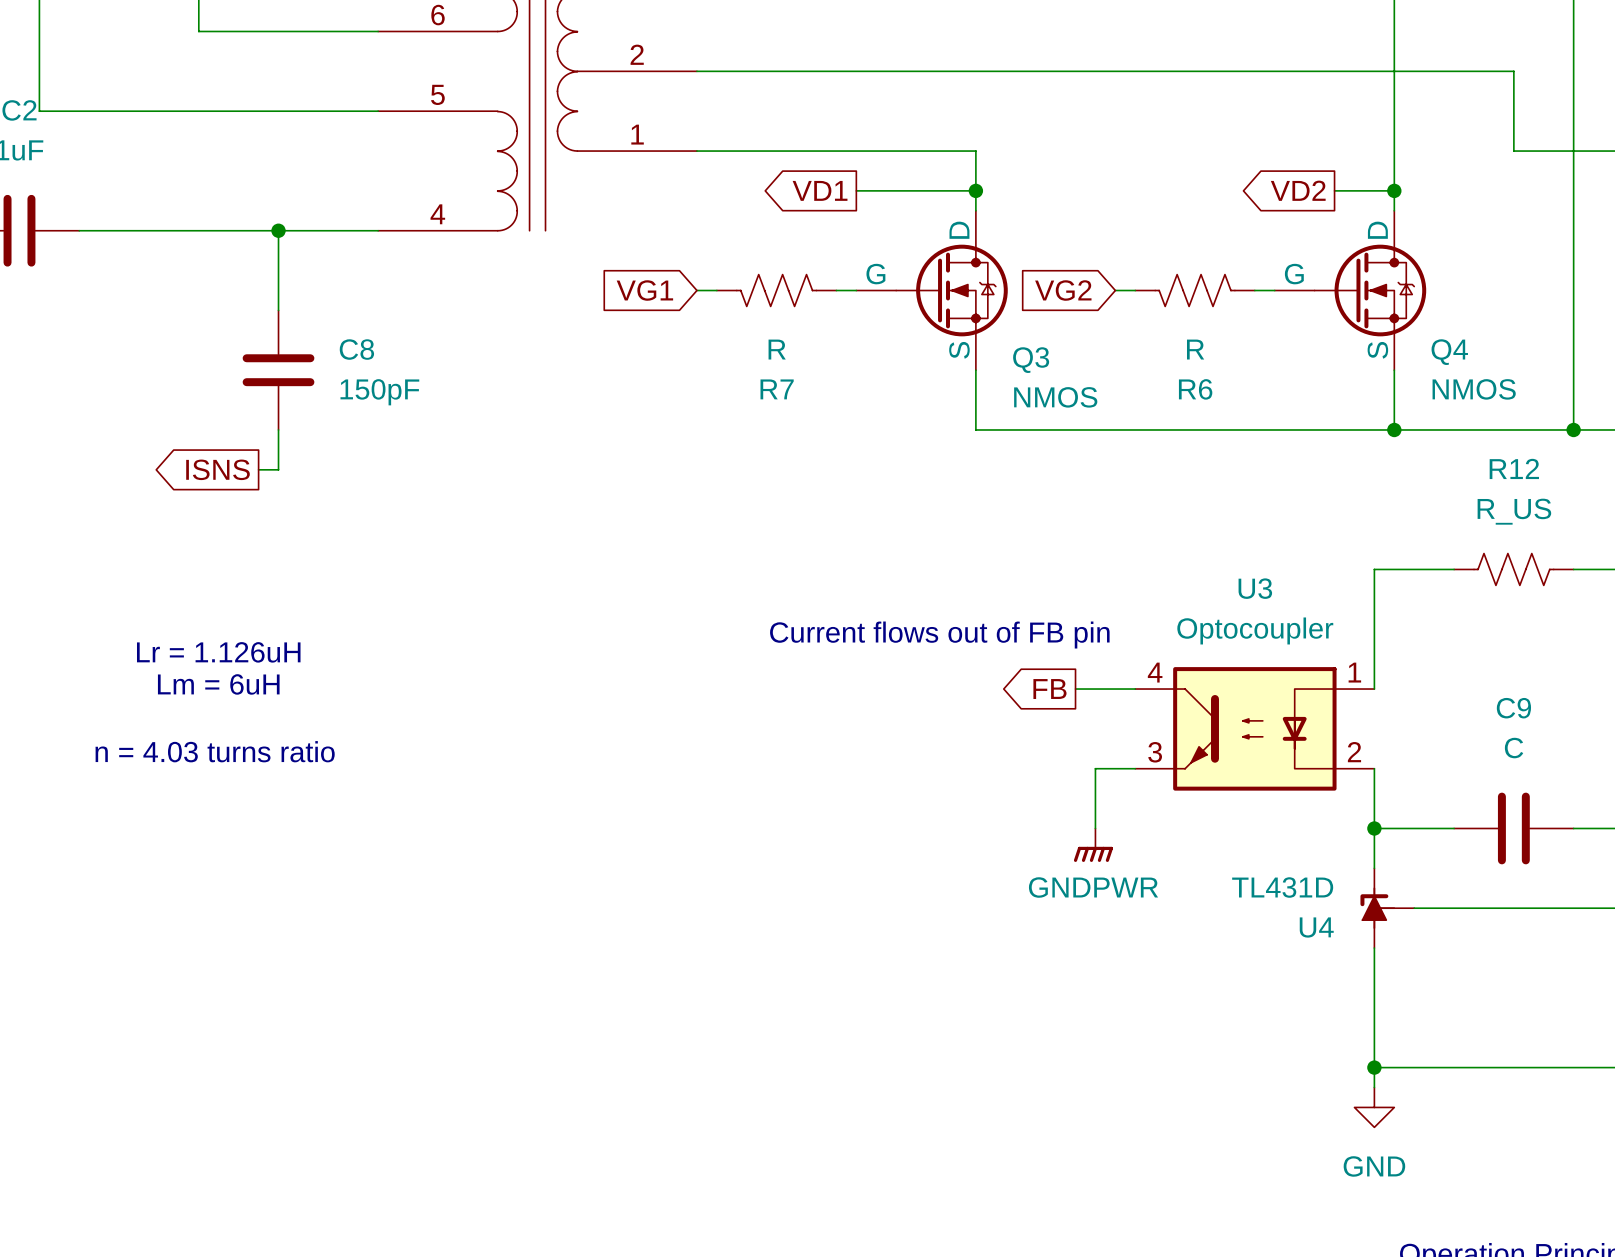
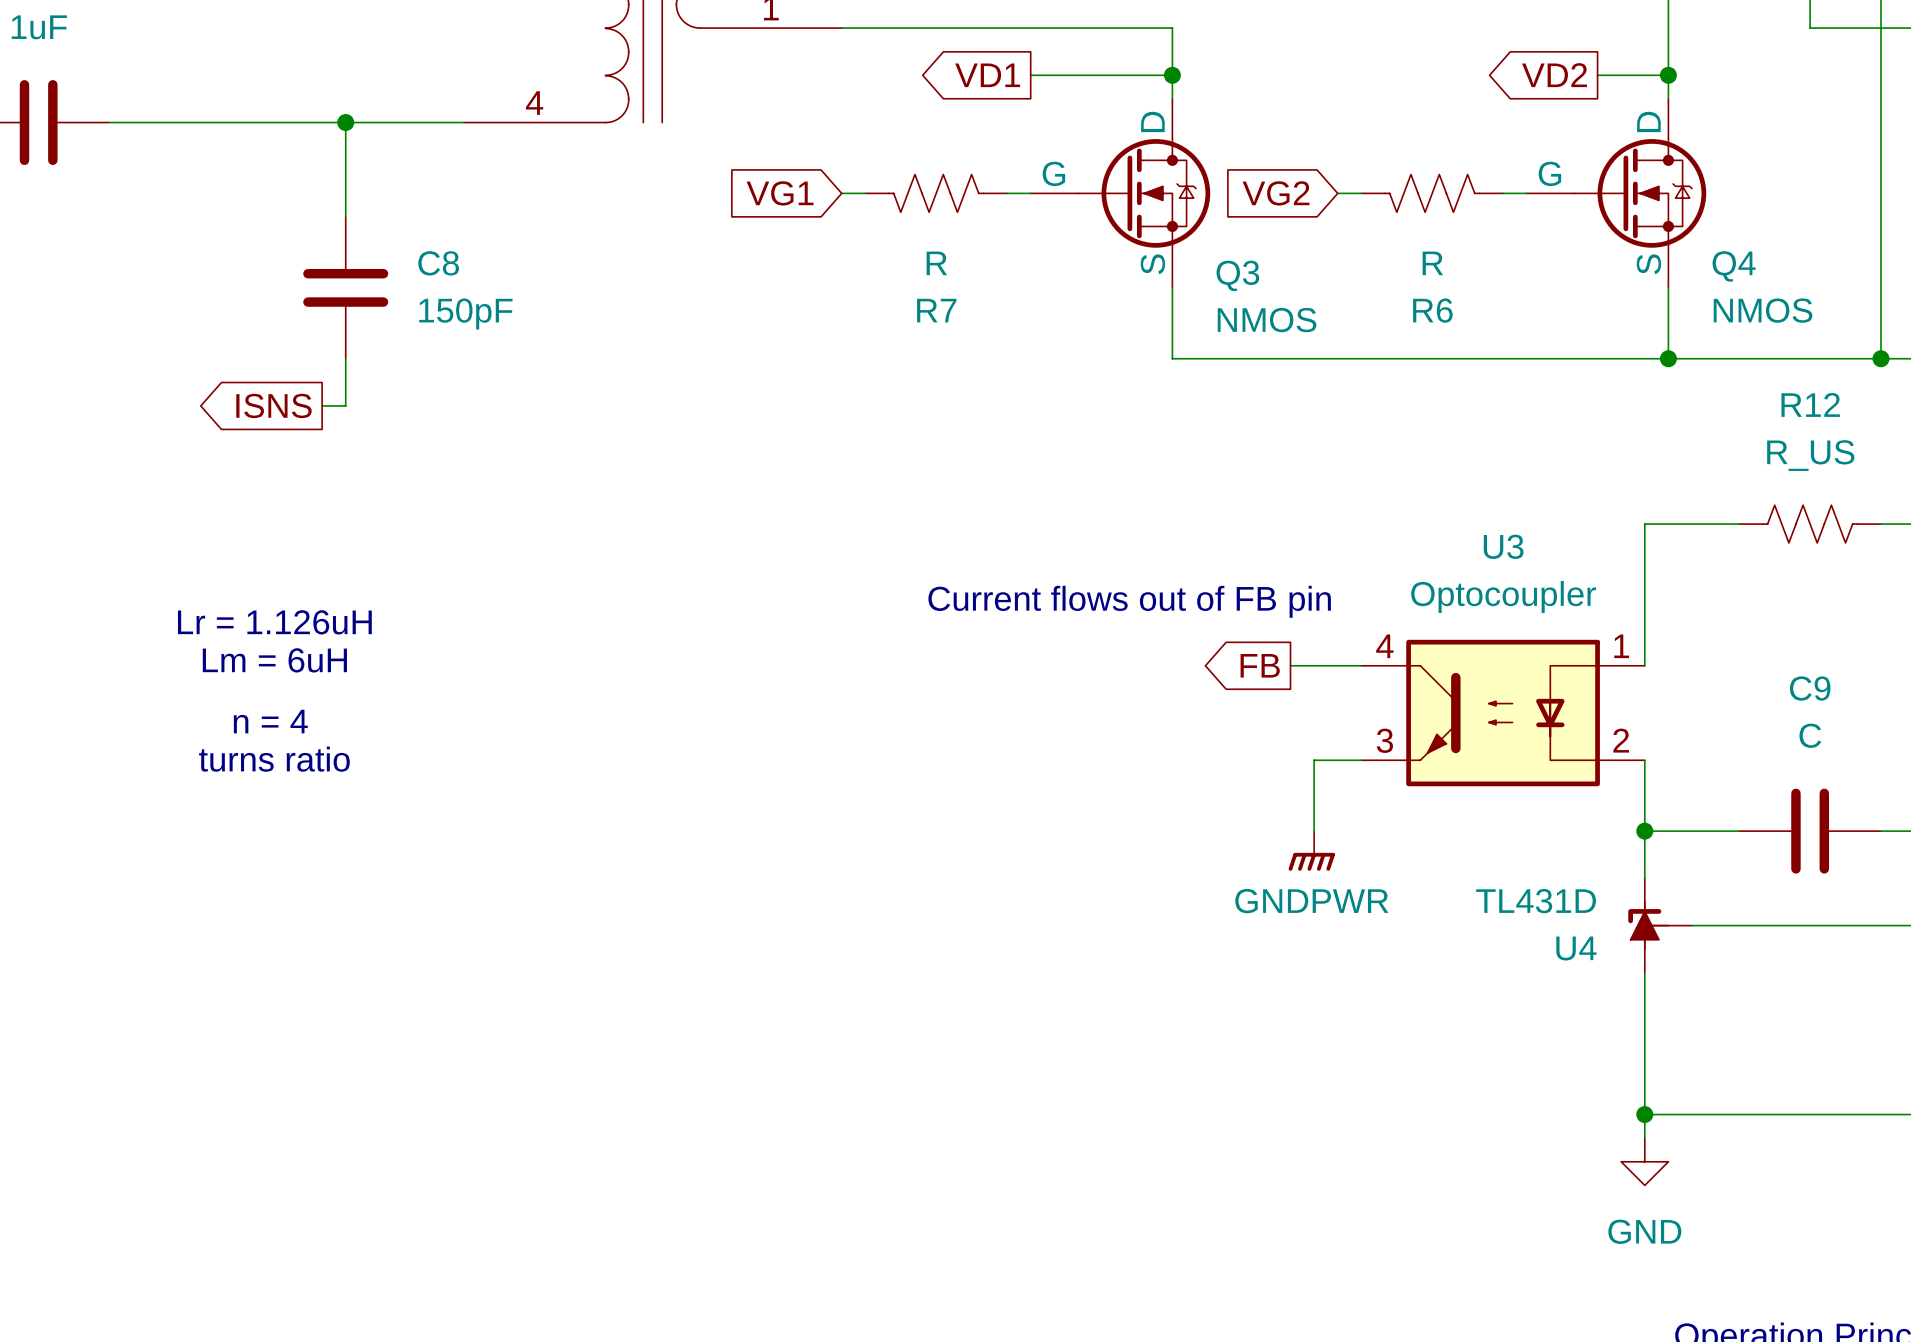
text: none -> n = 4 (270, 721)
text: n = 4.03 turns ratio (215, 751) -> turns ratio (274, 759)

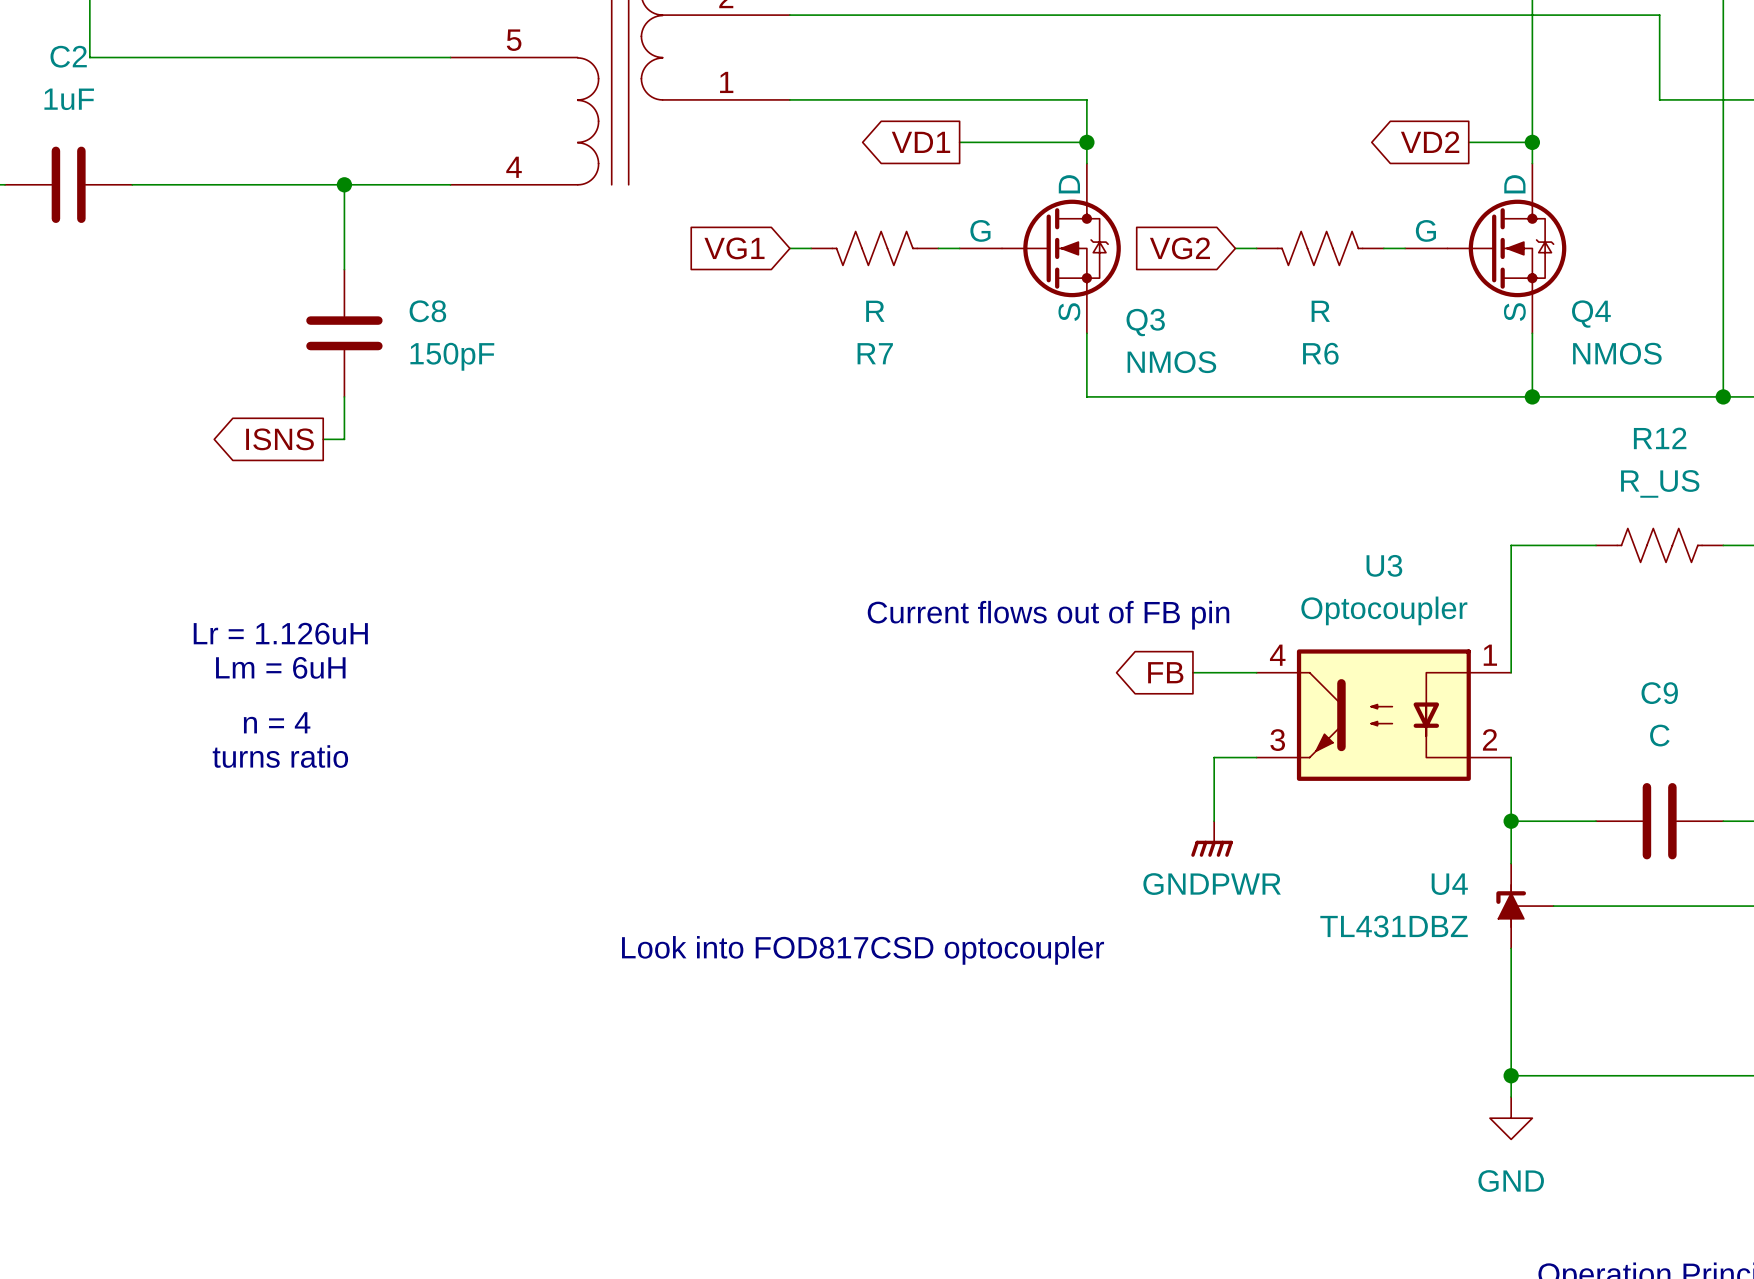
U4 symbol: [1628, 878, 1693, 973] -> [1496, 863, 1554, 949]
U4 value: TL431D (1536, 901) -> TL431DBZ (1394, 926)
U4 name position: U4 (1576, 948) -> U4 (1449, 884)
text: none -> Look into FOD817CSD optocoupler (863, 950)

